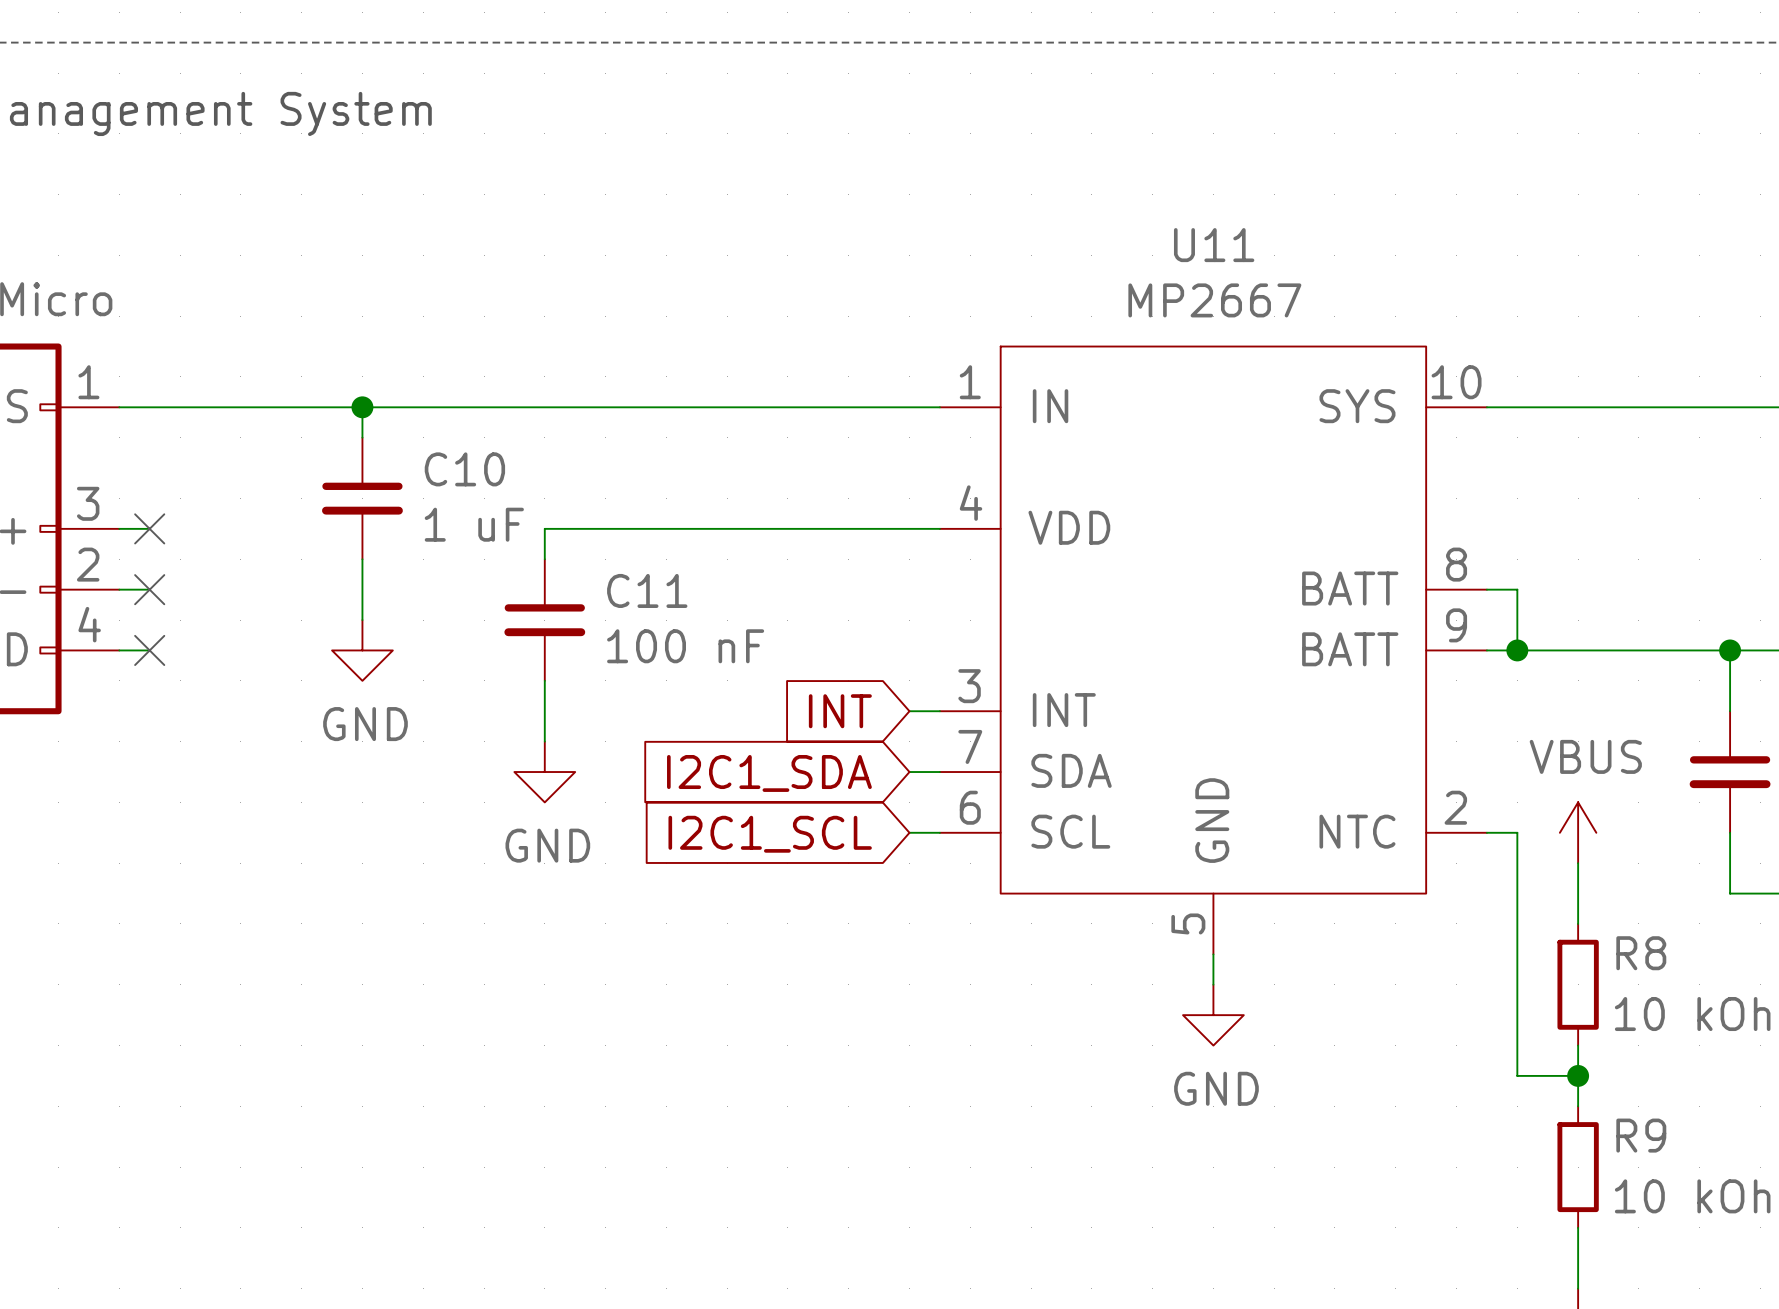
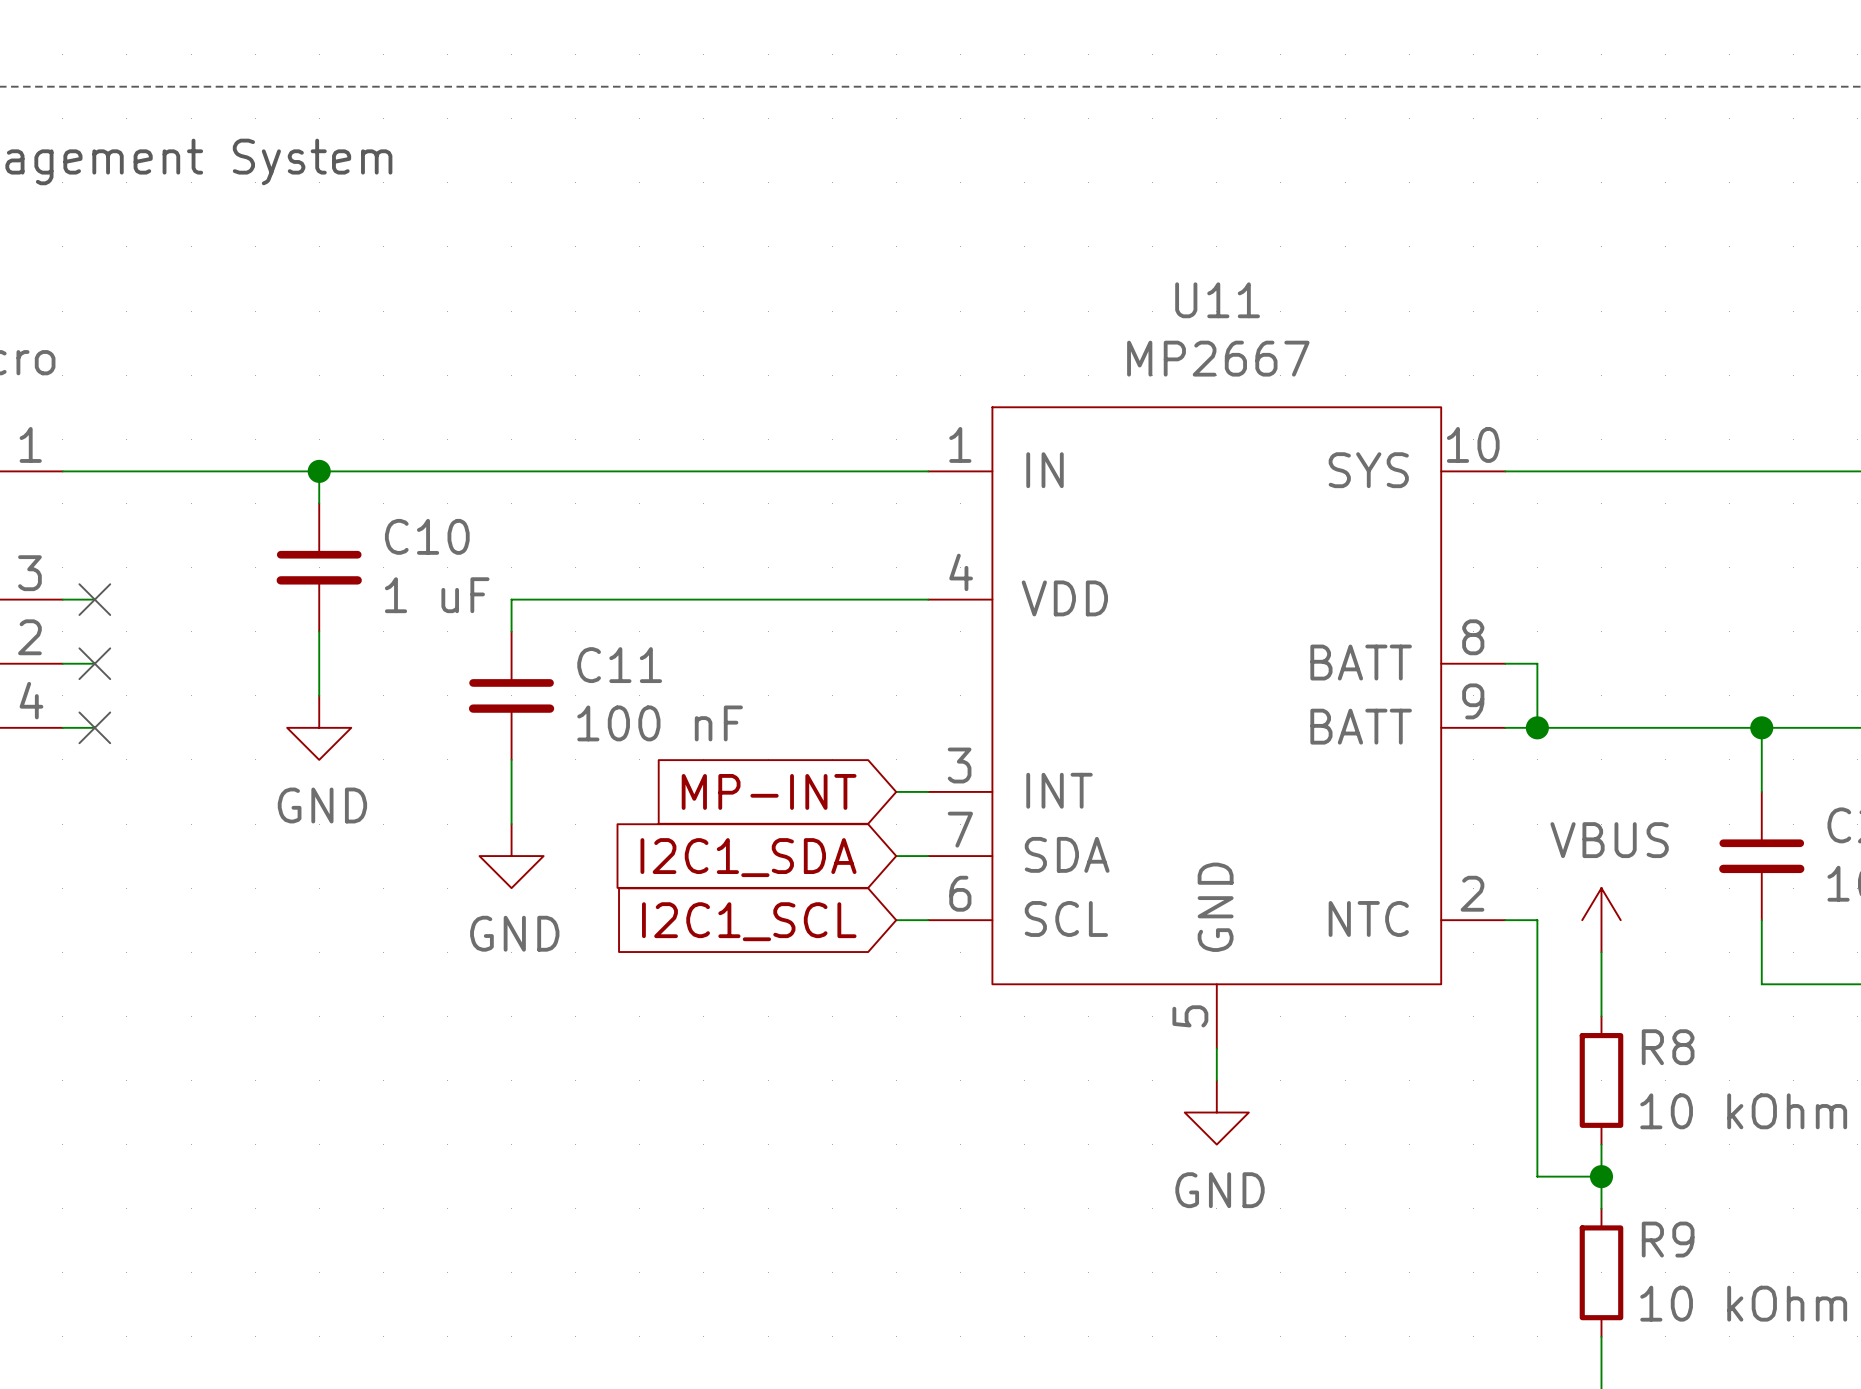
global label: INT (840, 711) -> MP-INT (769, 791)

